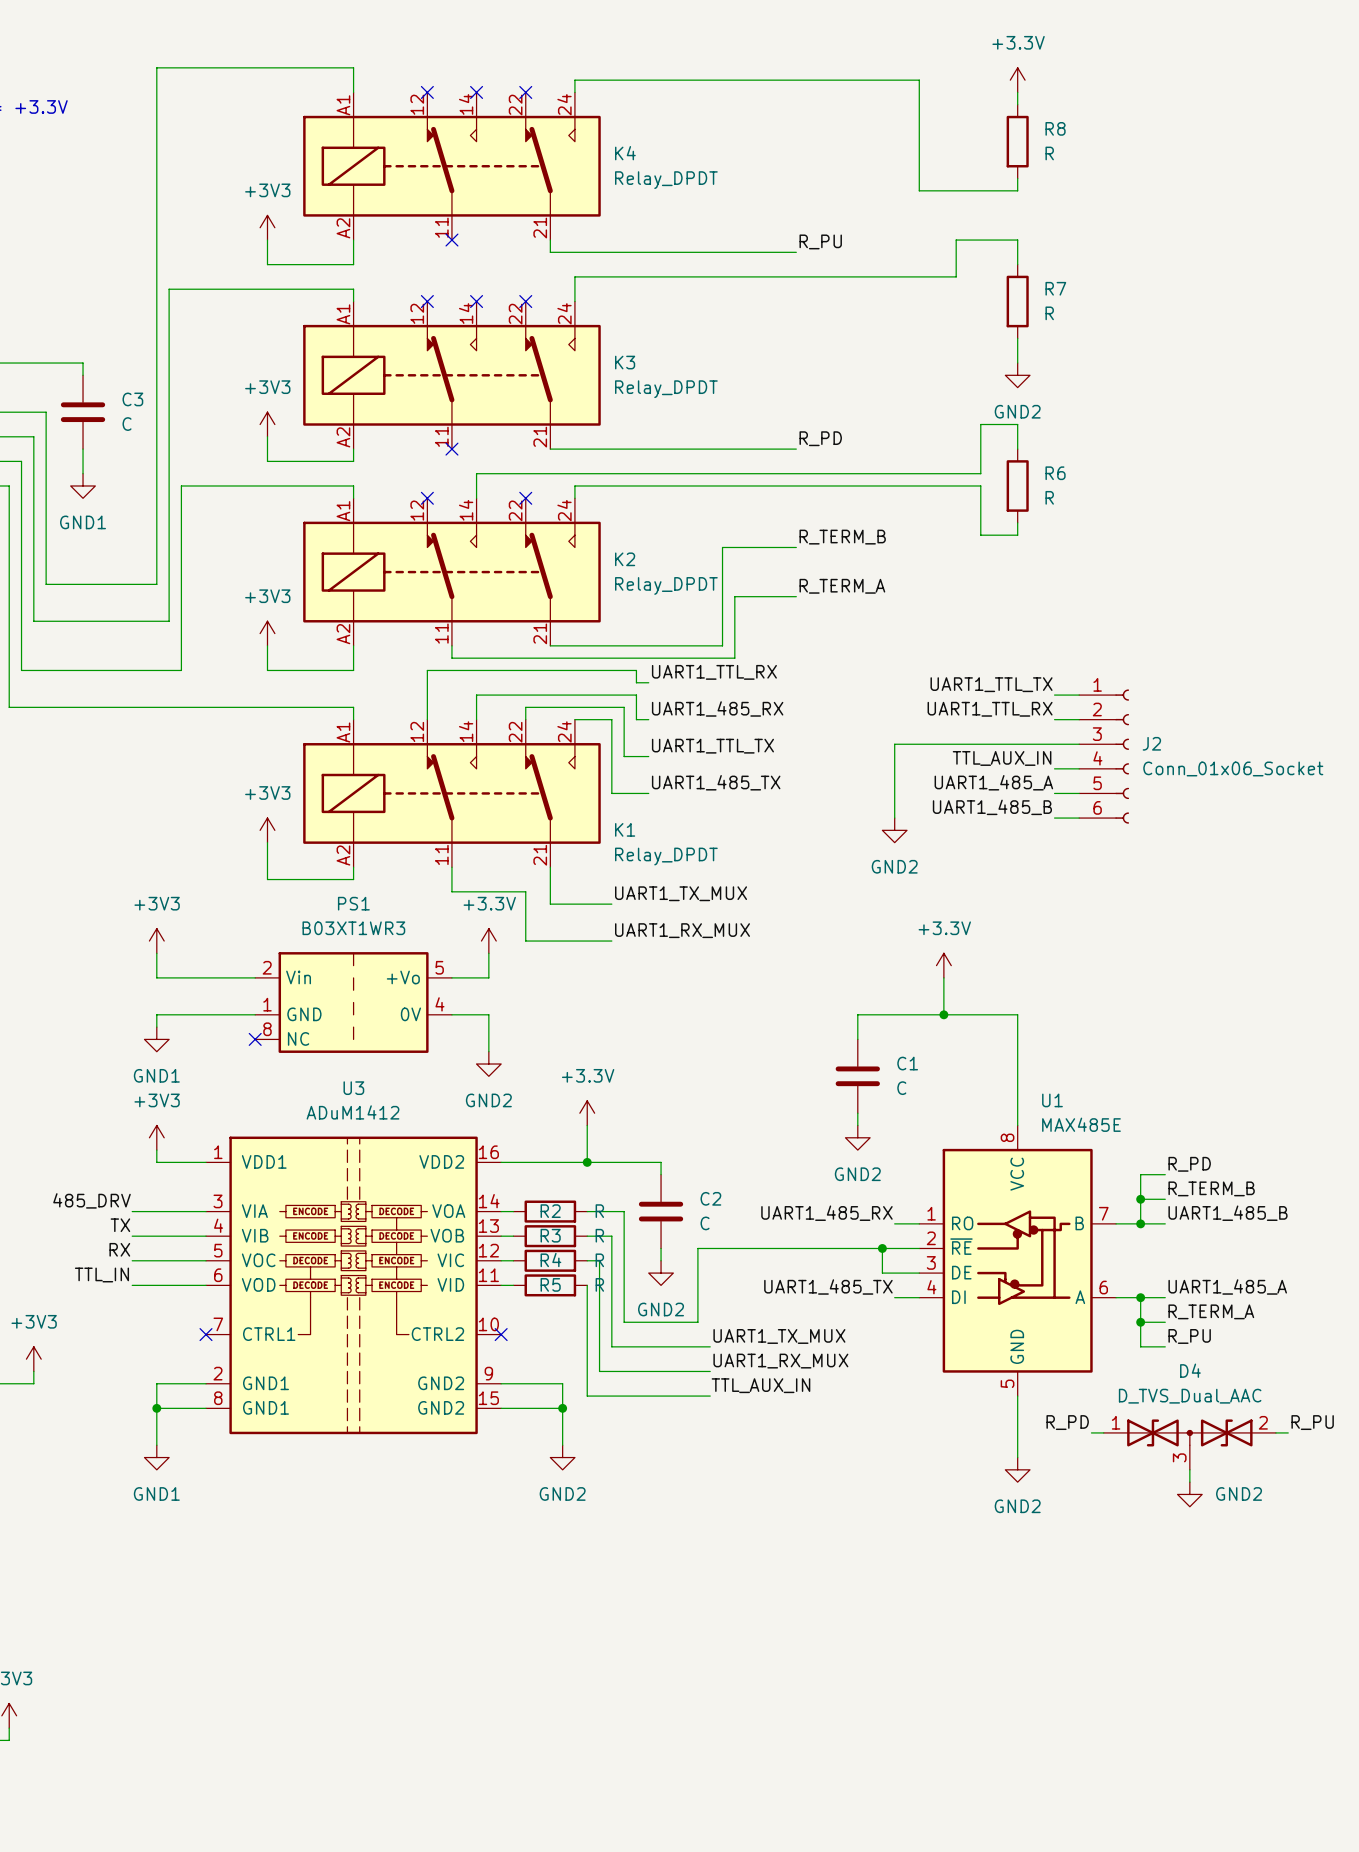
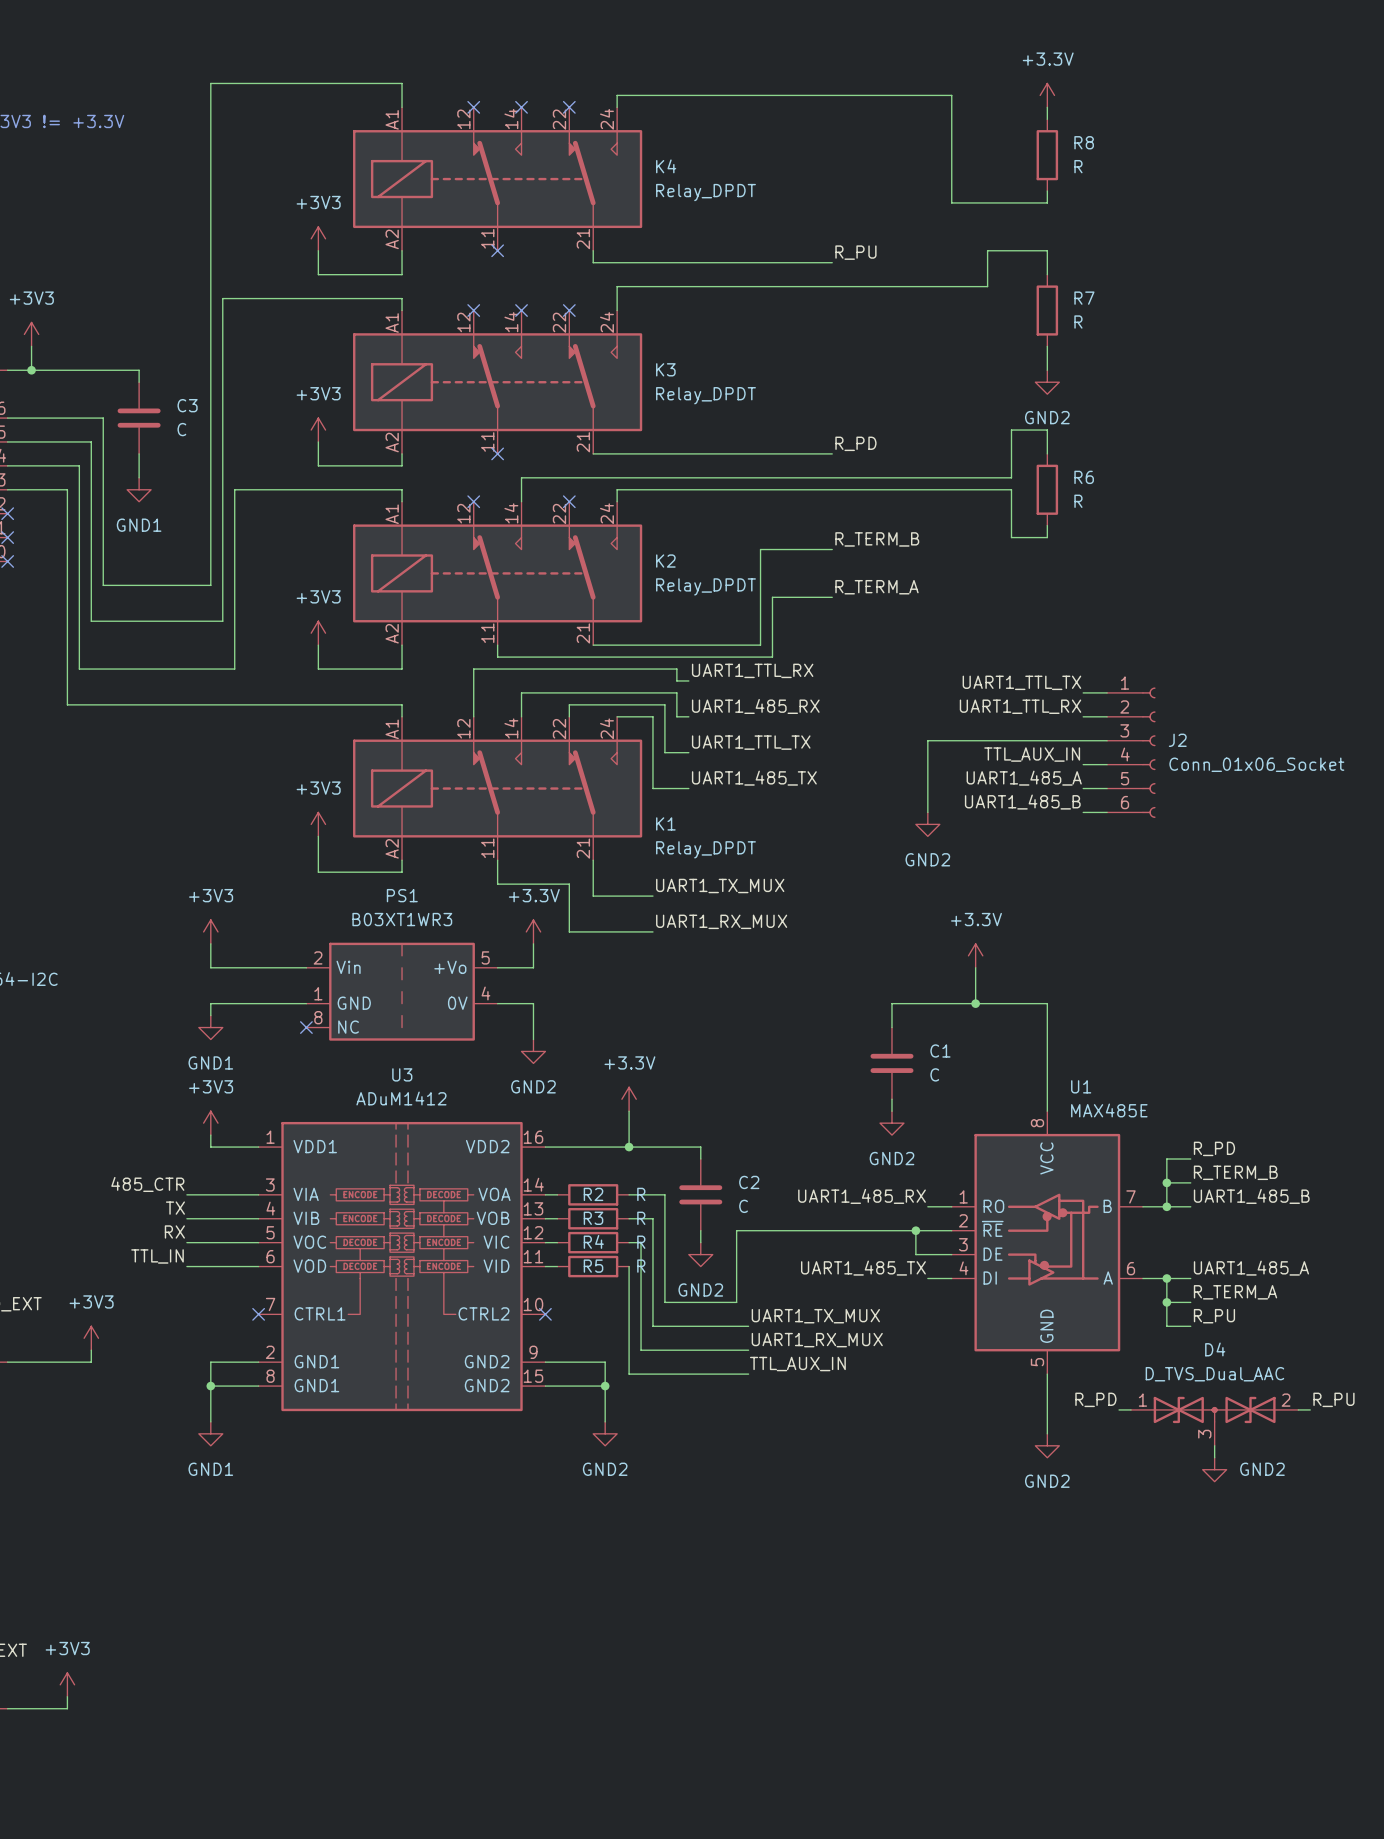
label: 485_DRV (92, 1200) -> 485_CTR (147, 1184)

